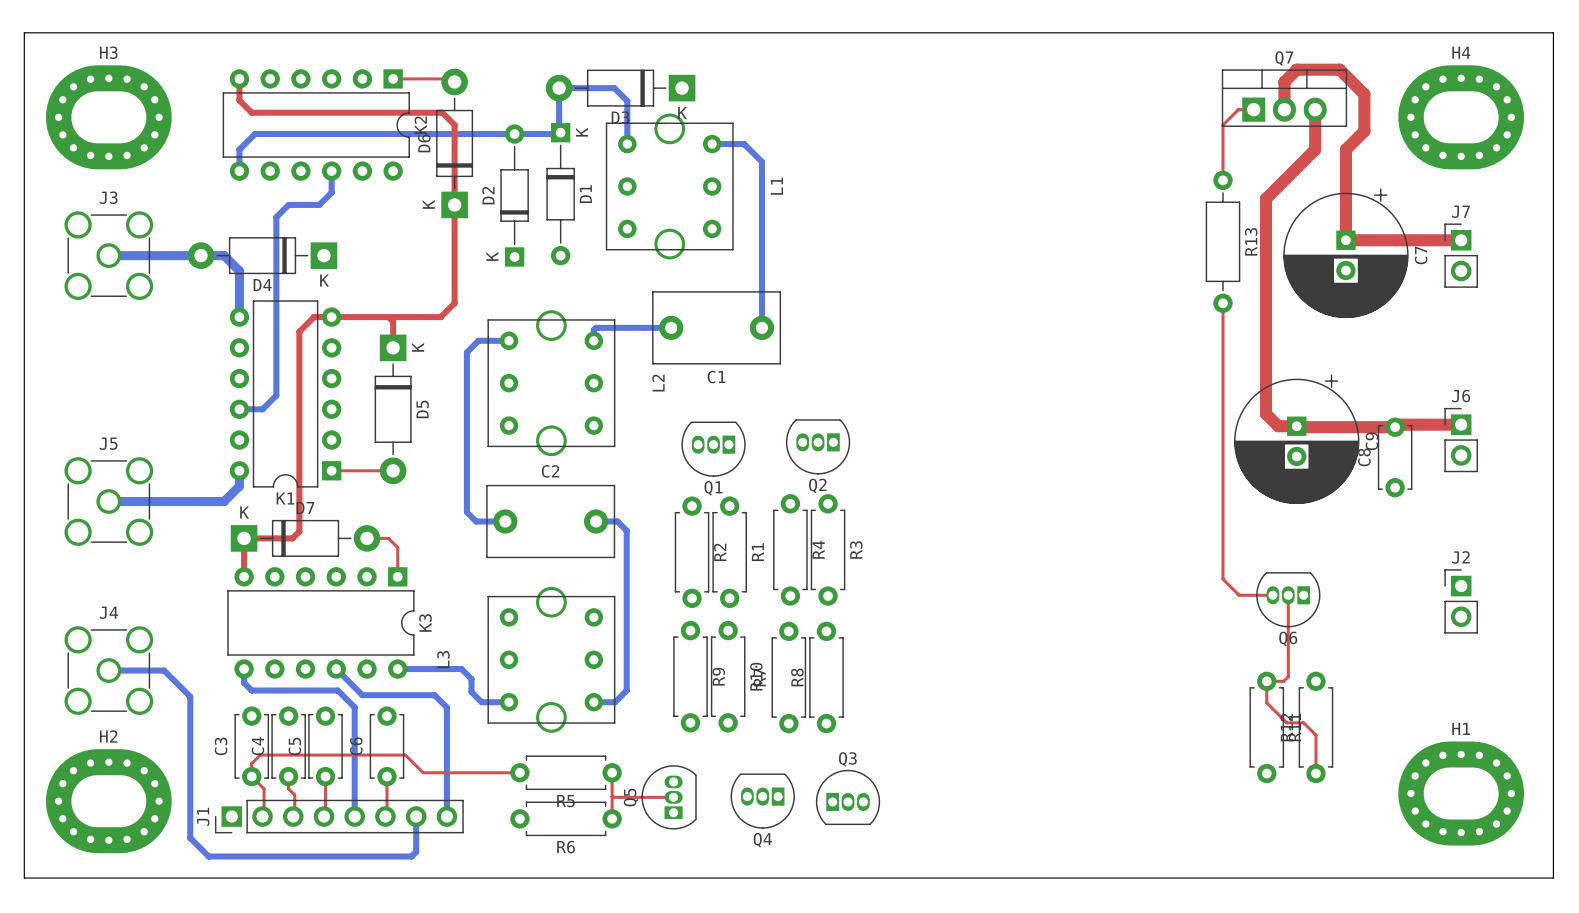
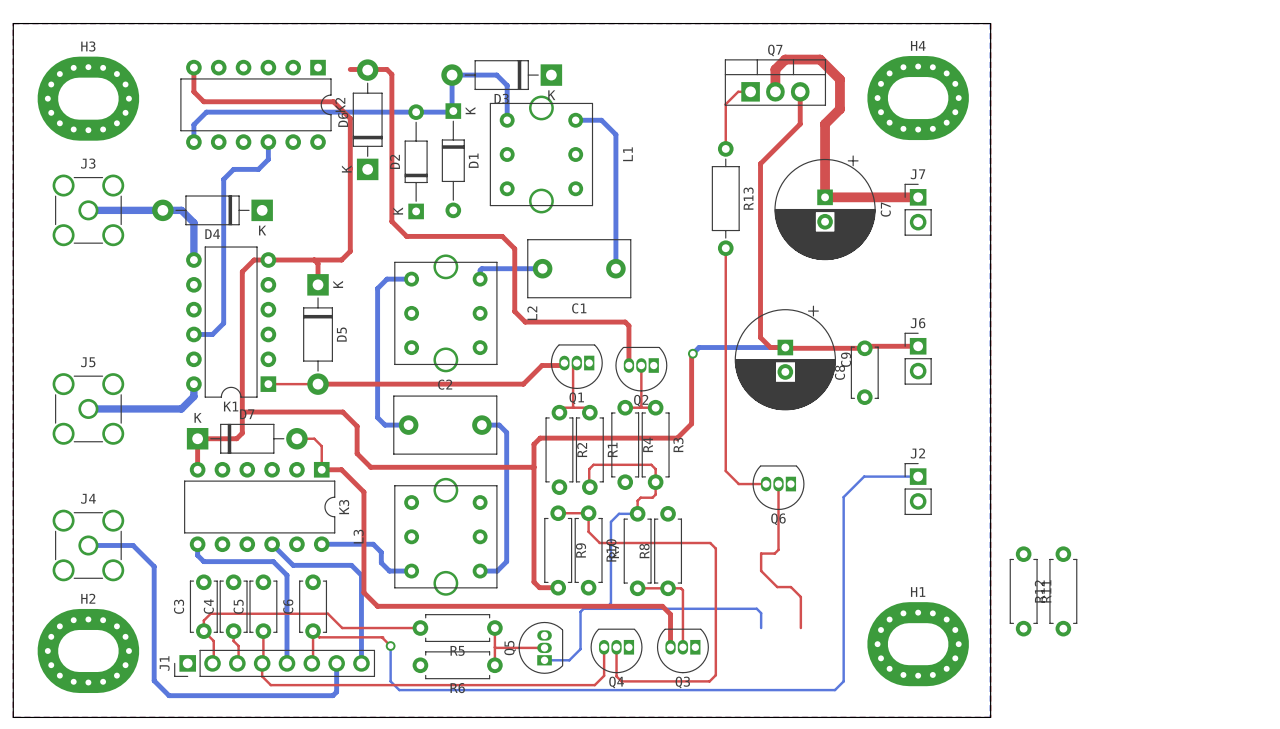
board edge: (24, 32) (24, 878) (1553, 878) (1553, 32) (24, 32) -> (13, 23) (13, 717) (990, 717) (990, 23) (13, 23)
top track: (393, 78) (451, 78) (454, 81) -> none
top track: none -> (350, 69) (386, 69) (391, 74) (391, 221) (406, 236) (502, 236) (514, 248) (514, 311) (525, 322) (625, 322) (628, 325) (628, 365)
Q7 position: (1284, 98) -> (775, 82)
top track: (239, 100) (251, 112) (442, 112) (454, 125) (454, 303) (440, 317) (422, 317) -> (193, 85) (193, 91) (203, 101) (333, 101) (350, 118) (350, 251) (341, 260)
top track: none -> (750, 91) (738, 91) (725, 104) (725, 148)
top track: none -> (775, 91) (775, 69) (785, 59) (820, 59) (839, 79) (839, 109) (825, 124) (825, 197) (918, 197)
top track: none -> (800, 91) (800, 124) (760, 163) (760, 337) (770, 347) (864, 348) (866, 346) (918, 346)
top track: (1253, 109) (1238, 109) (1222, 125) (1222, 180) -> none
top track: (1284, 109) (1284, 81) (1296, 69) (1339, 69) (1364, 94) (1364, 131) (1345, 149) (1345, 240) (1461, 240) -> none
top track: (1315, 109) (1315, 149) (1266, 198) (1266, 413) (1278, 426) (1395, 427) (1397, 424) (1461, 424) -> none
H4 position: (1461, 117) -> (918, 98)
R13 position: (1222, 241) -> (725, 198)
C7 position: (1345, 253) -> (825, 207)
J7 position: (1461, 255) -> (918, 209)
top track: none -> (725, 248) (725, 471) (738, 484) (766, 484)
top track: (1222, 303) (1222, 579) (1239, 595) (1272, 595) -> none
bottom track: none -> (785, 347) (699, 347) (692, 353)
via: none -> (692, 353)
top track: none -> (691, 355) (691, 423) (677, 438) (540, 438) (533, 444) (533, 582) (539, 587) (558, 587)
C9 position: (1296, 439) -> (785, 357)
J6 position: (1461, 440) -> (918, 358)
Q2 position: (818, 446) -> (641, 369)
top track: none -> (560, 365) (542, 365) (523, 384) (318, 384)
top track: none -> (573, 365) (573, 407)
top track: none -> (641, 365) (640, 407)
C8 position: (1395, 457) -> (864, 372)
top track: none -> (558, 407) (589, 407)
top track: none -> (625, 407) (655, 407)
top track: none -> (242, 412) (342, 412) (357, 426) (357, 453) (370, 467) (533, 467)
R4 position: (790, 549) -> (625, 444)
R3 position: (828, 549) -> (655, 444)
top track: none -> (321, 469) (341, 469) (363, 492) (363, 592) (377, 606) (662, 606) (670, 614) (670, 647)
bottom track: none -> (918, 476) (864, 476) (843, 497) (843, 681) (834, 690) (399, 690) (390, 681) (390, 646)
top track: none -> (589, 482) (589, 469) (593, 464) (651, 464) (655, 469) (655, 494) (652, 497) (640, 497) (637, 500) (637, 513)
top track: none -> (778, 484) (778, 549) (774, 553) (761, 553) (761, 570) (777, 587) (790, 587) (800, 597) (800, 628)
top track: (1288, 595) (1288, 676) (1283, 681) (1266, 681) (1266, 702) (1286, 722) (1303, 722) (1315, 735) (1315, 773) -> none
Q6 position: (1288, 599) -> (778, 487)
J2 position: (1461, 601) -> (918, 489)
top track: none -> (558, 513) (588, 513) (588, 531) (599, 543) (710, 543) (715, 548) (715, 675) (709, 681) (621, 681) (616, 676) (616, 647)
bottom track: none -> (637, 513) (619, 513) (610, 521) (610, 603) (605, 608)
top track: none -> (637, 588) (681, 588) (682, 590) (682, 647)
bottom track: none -> (761, 628) (761, 613) (756, 608) (583, 608) (580, 611) (580, 649) (569, 660) (544, 660)
top track: none -> (313, 631) (319, 637) (383, 637)
top track: none -> (381, 637) (390, 646)
H1 position: (1461, 793) -> (918, 644)
via: none -> (390, 646)
top track: none -> (604, 647) (604, 675) (594, 685) (270, 685) (262, 676) (262, 663)
Q3 rotation: 0° (848, 797) -> 180° (682, 650)

